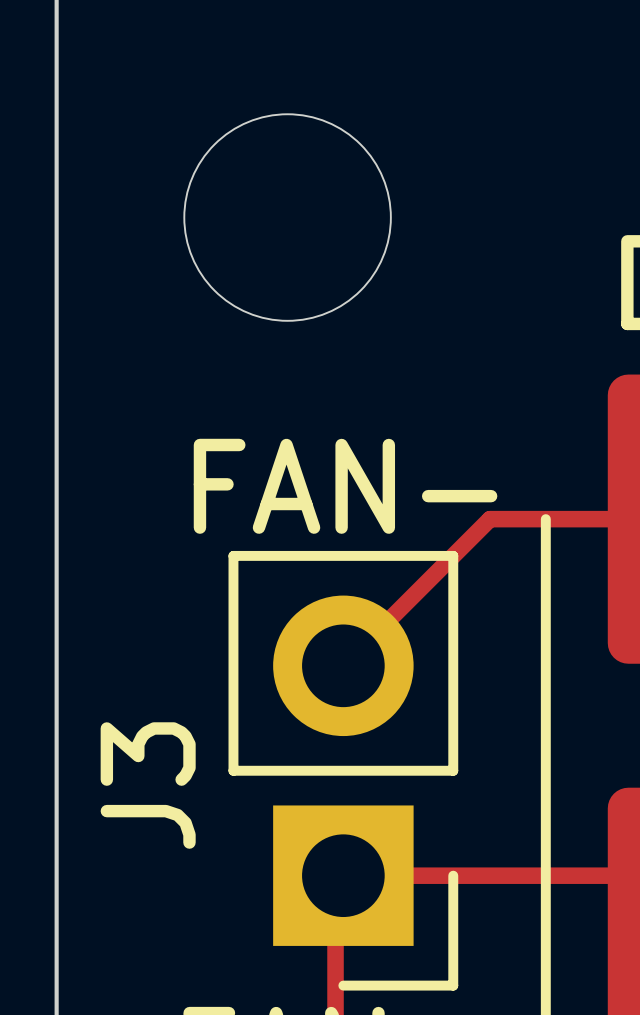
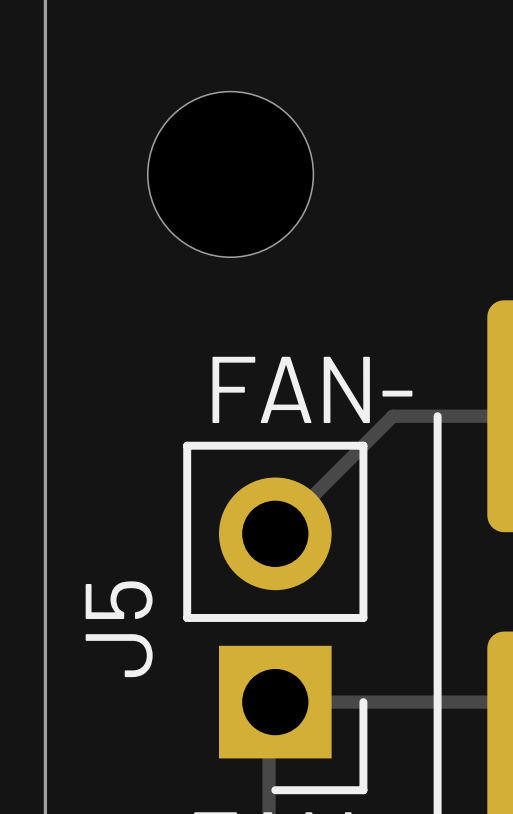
J3 name: J3 (148, 785) -> J5 (119, 629)

